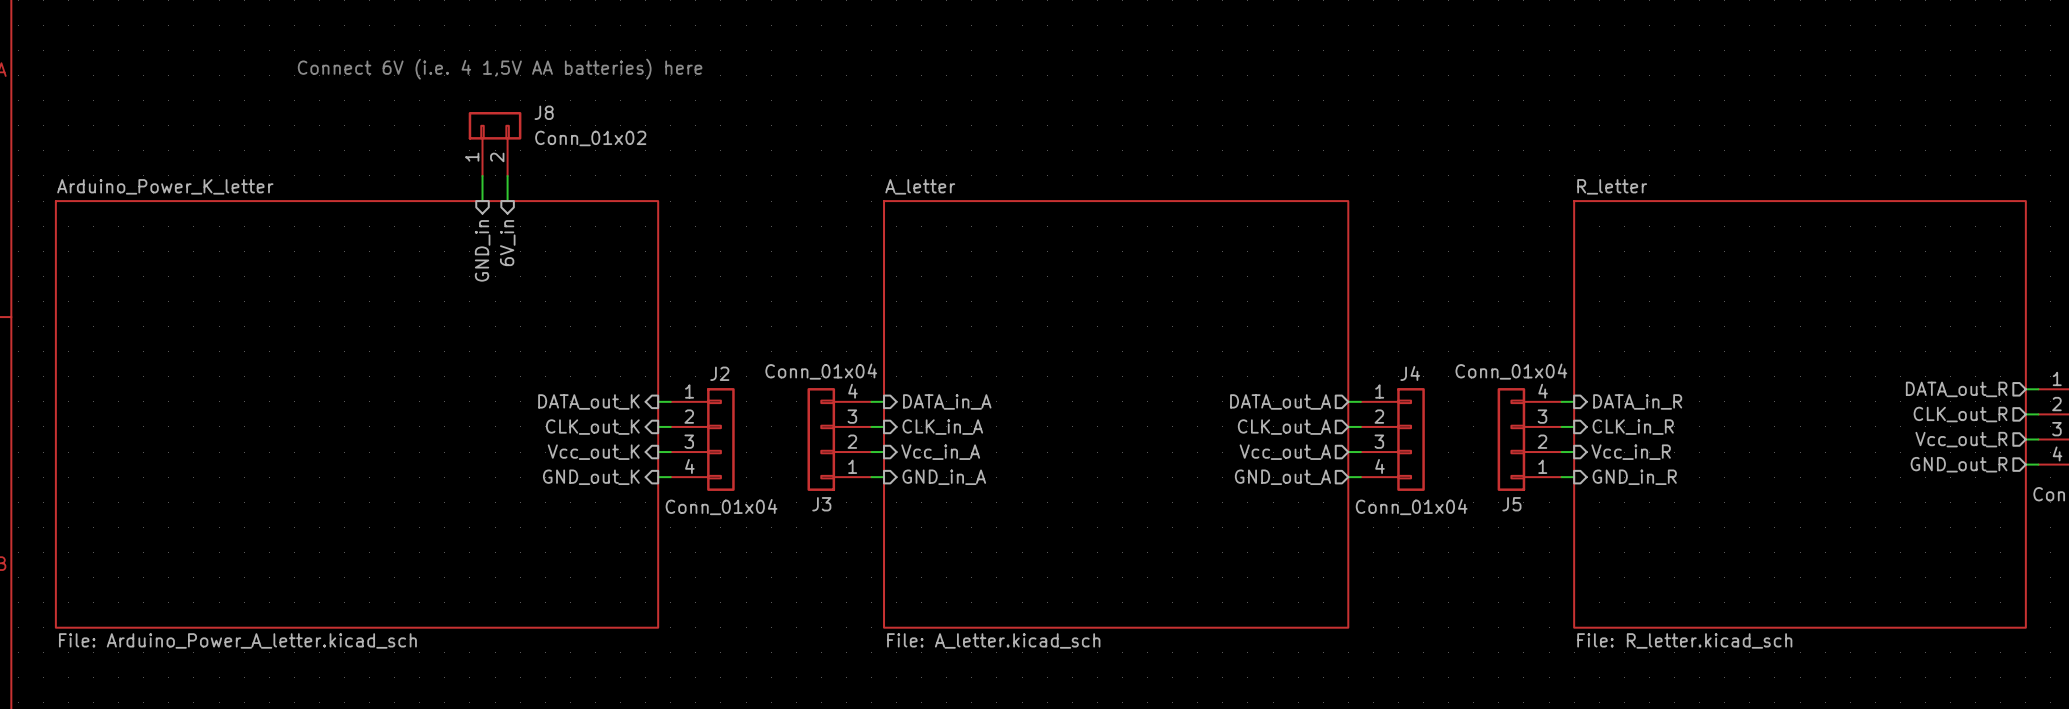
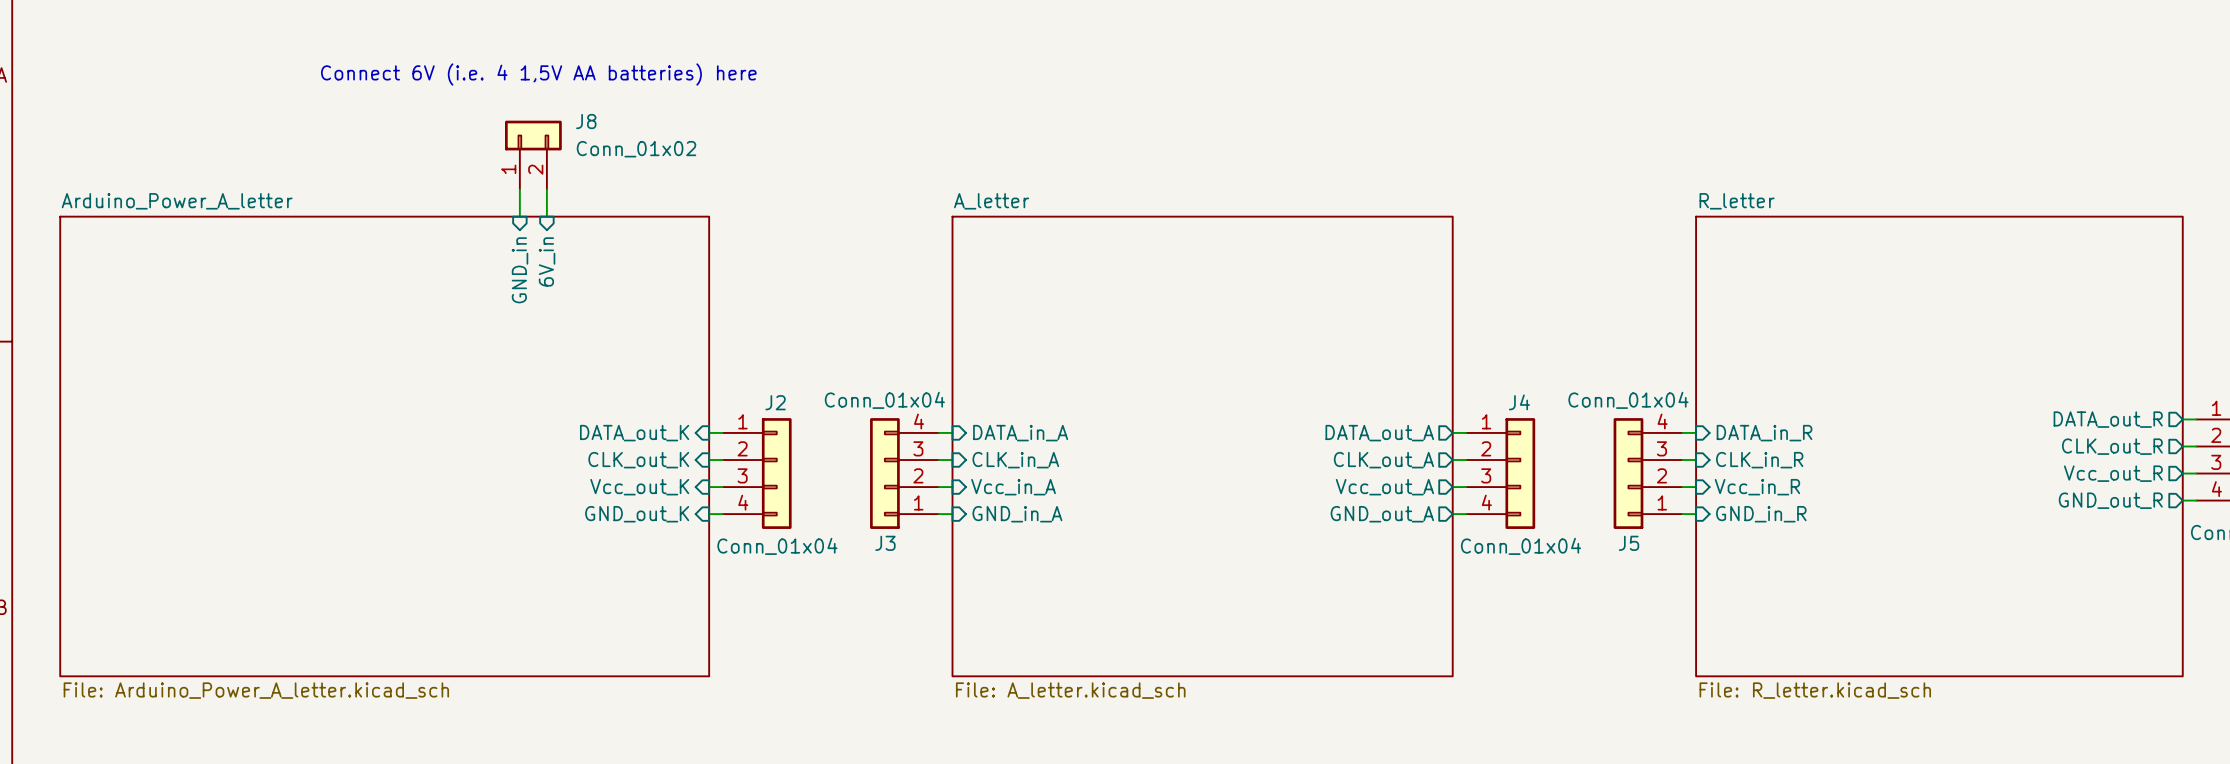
sheet Arduino_Power_K_letter name: Arduino_Power_K_letter (165, 186) -> Arduino_Power_A_letter (177, 201)

